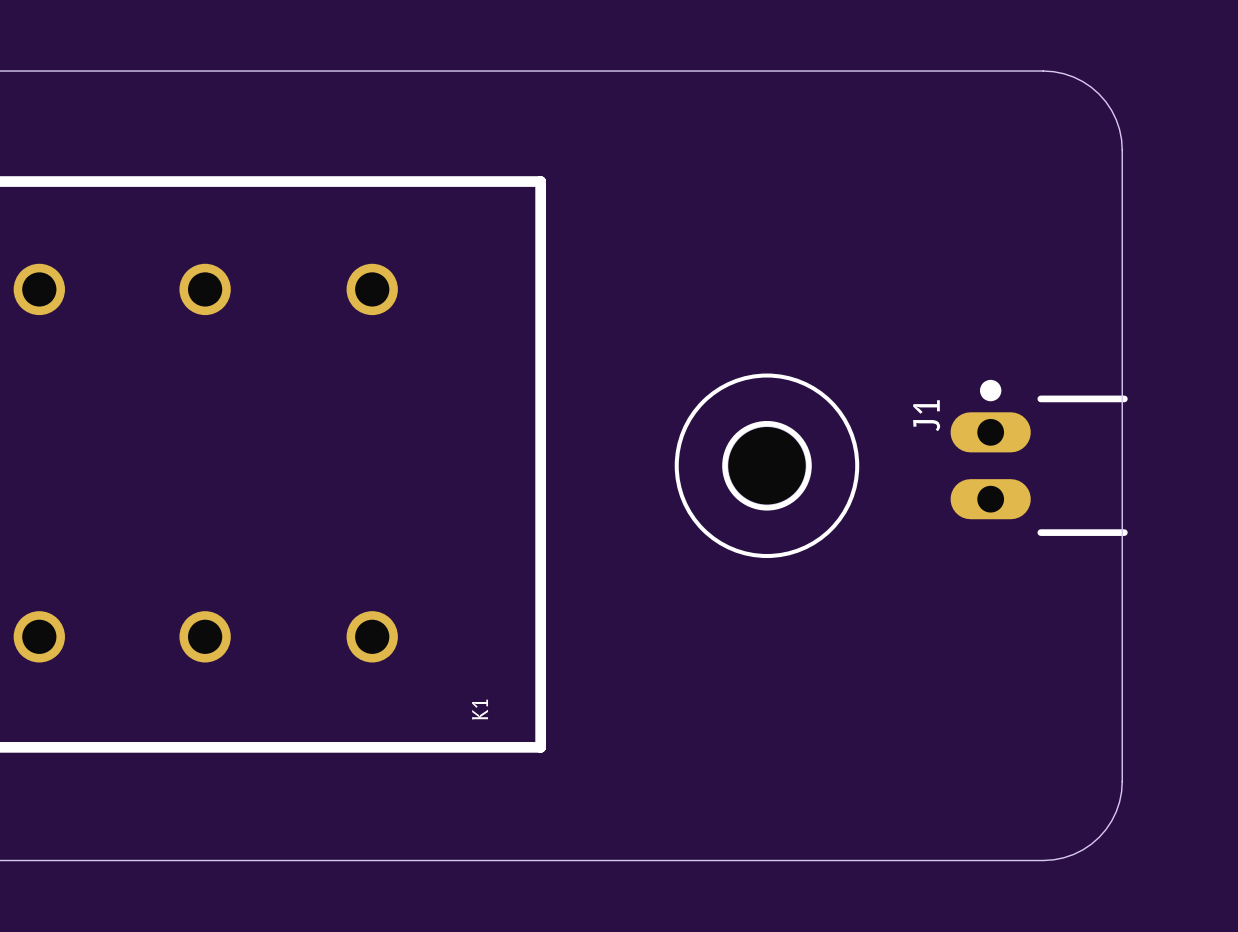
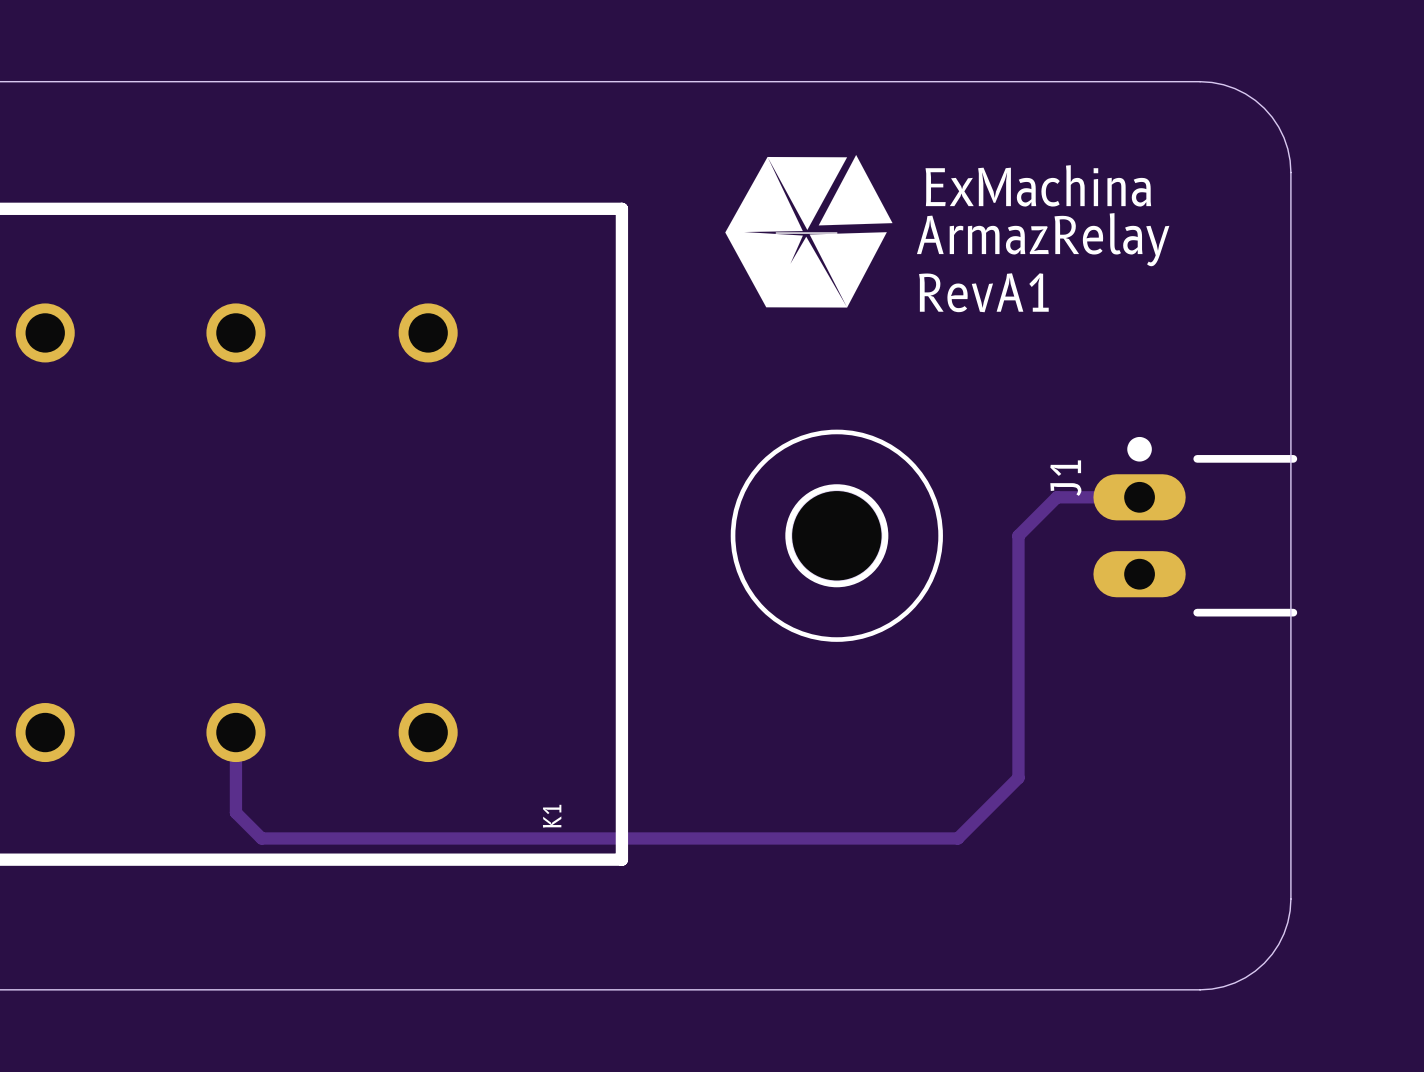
drawing: none -> [725, 154, 893, 308]
text: none -> ArmazRelay (1043, 239)
text: none -> RevA1 (983, 292)
track: none -> (1139, 497) (1056, 497) (1018, 535) (1018, 777) (957, 838) (261, 838) (235, 812) (235, 732)
part position: (766, 465) -> (836, 535)

